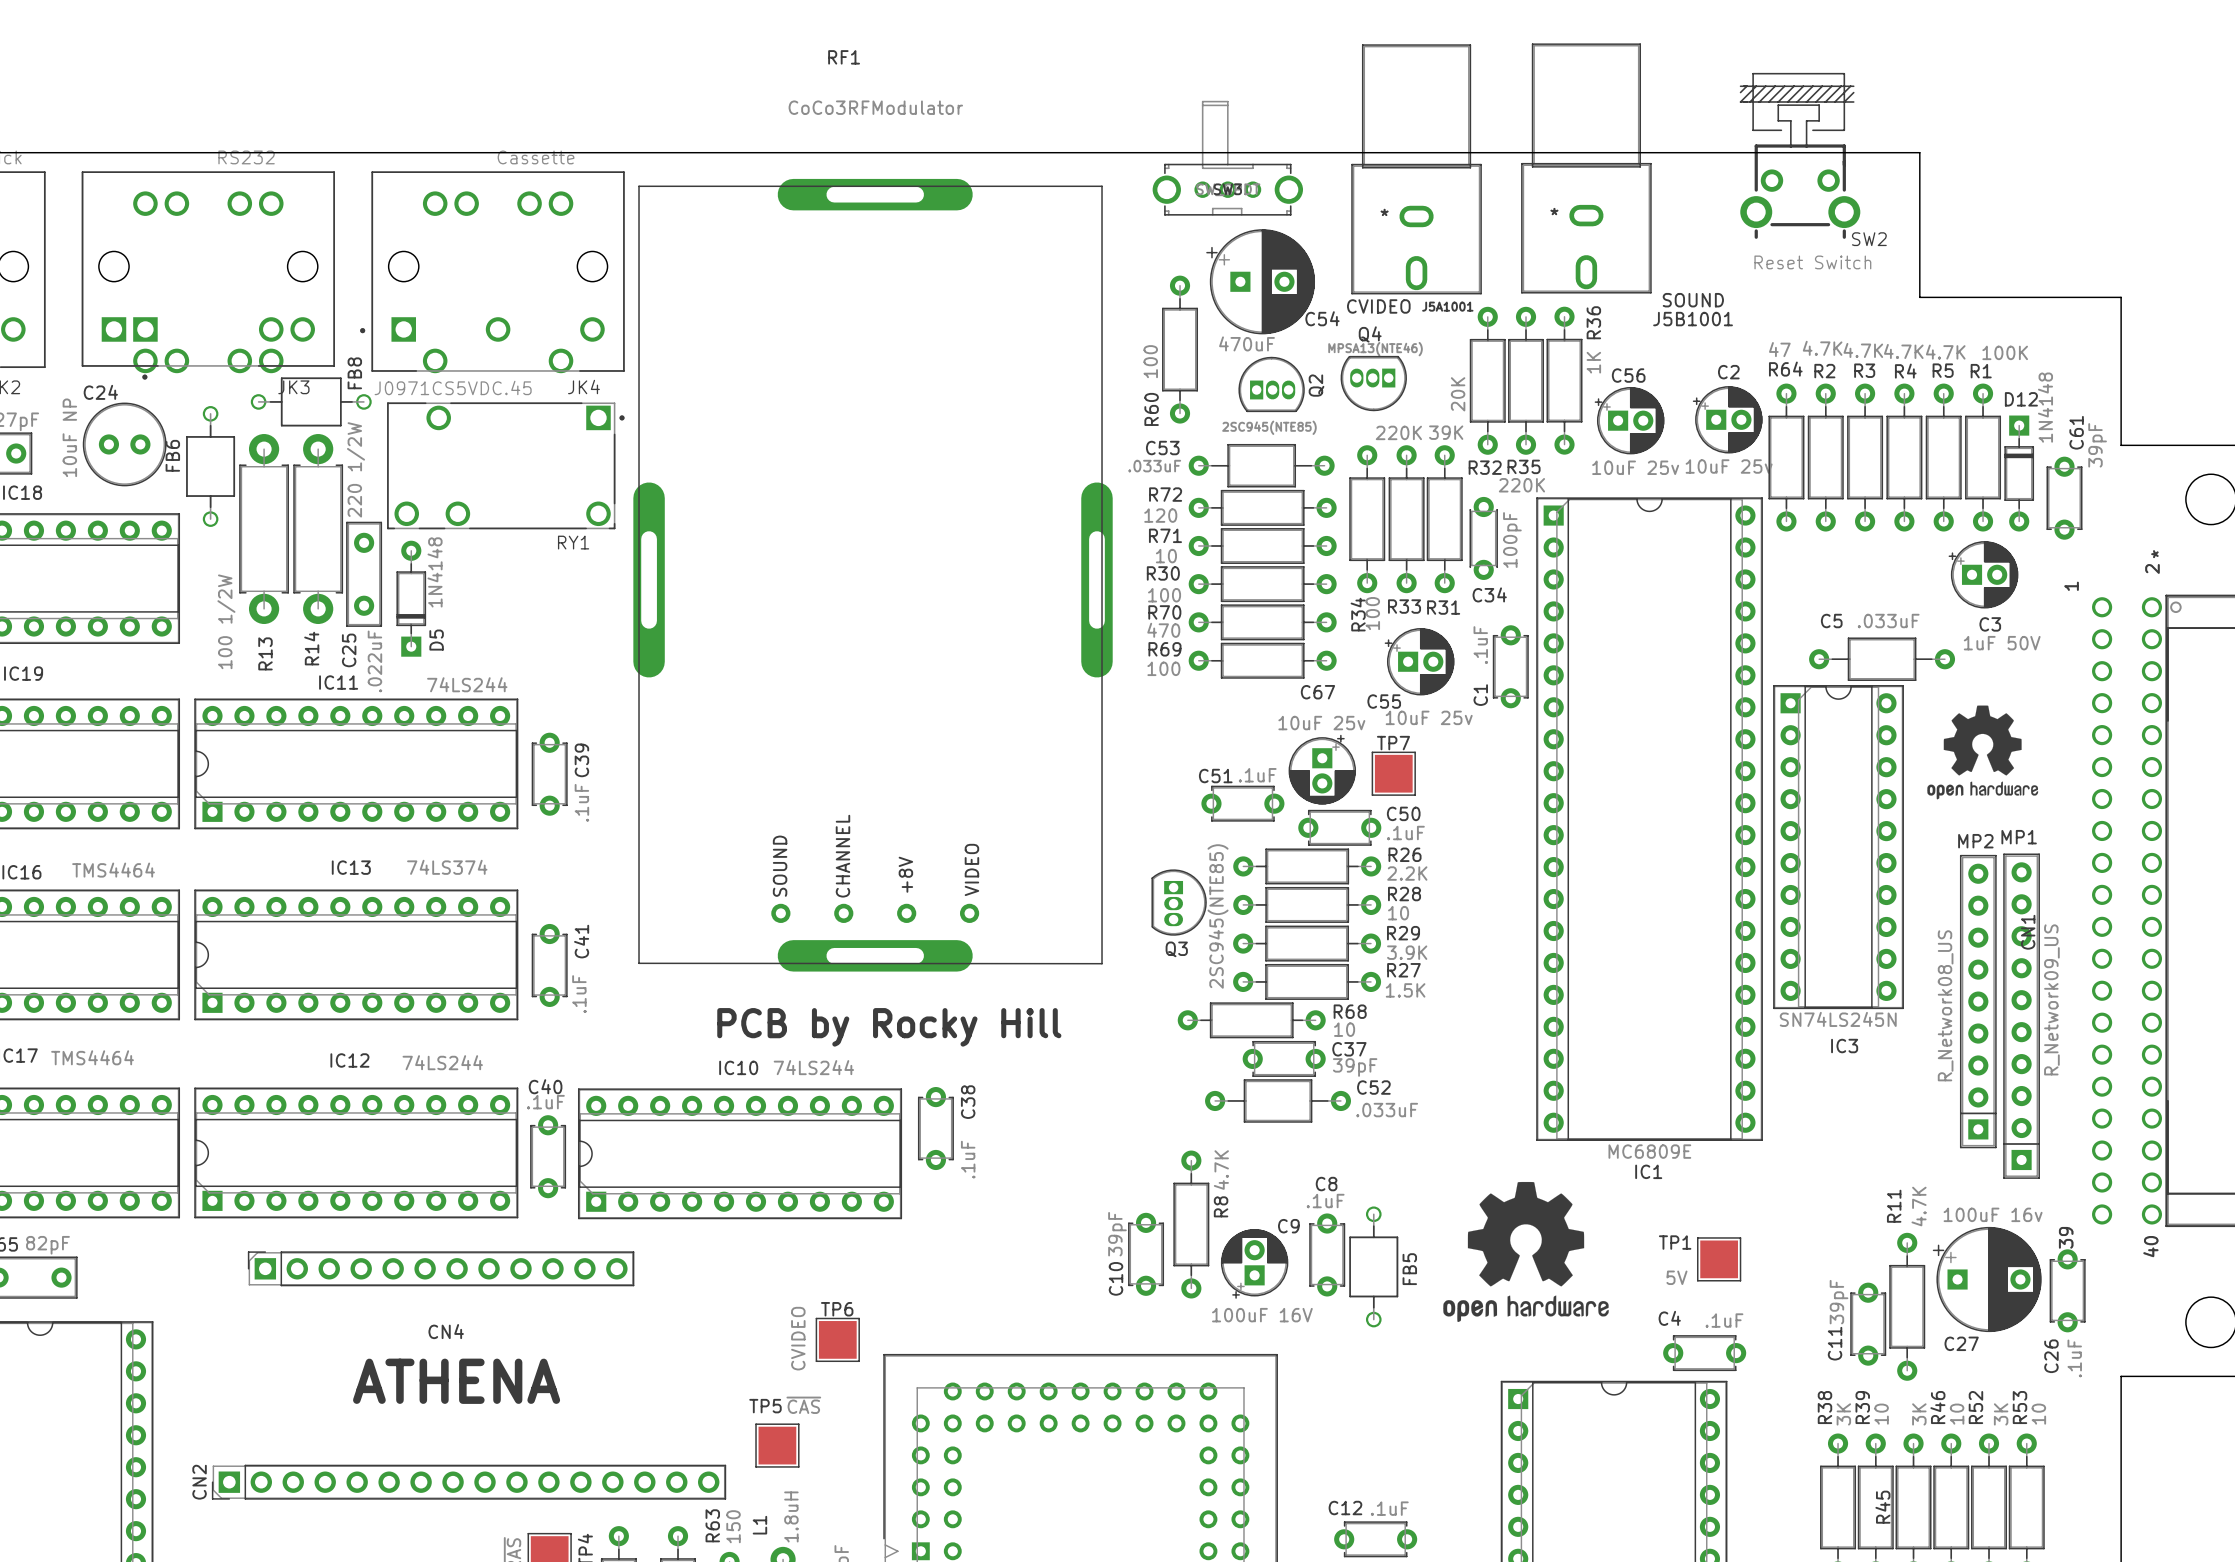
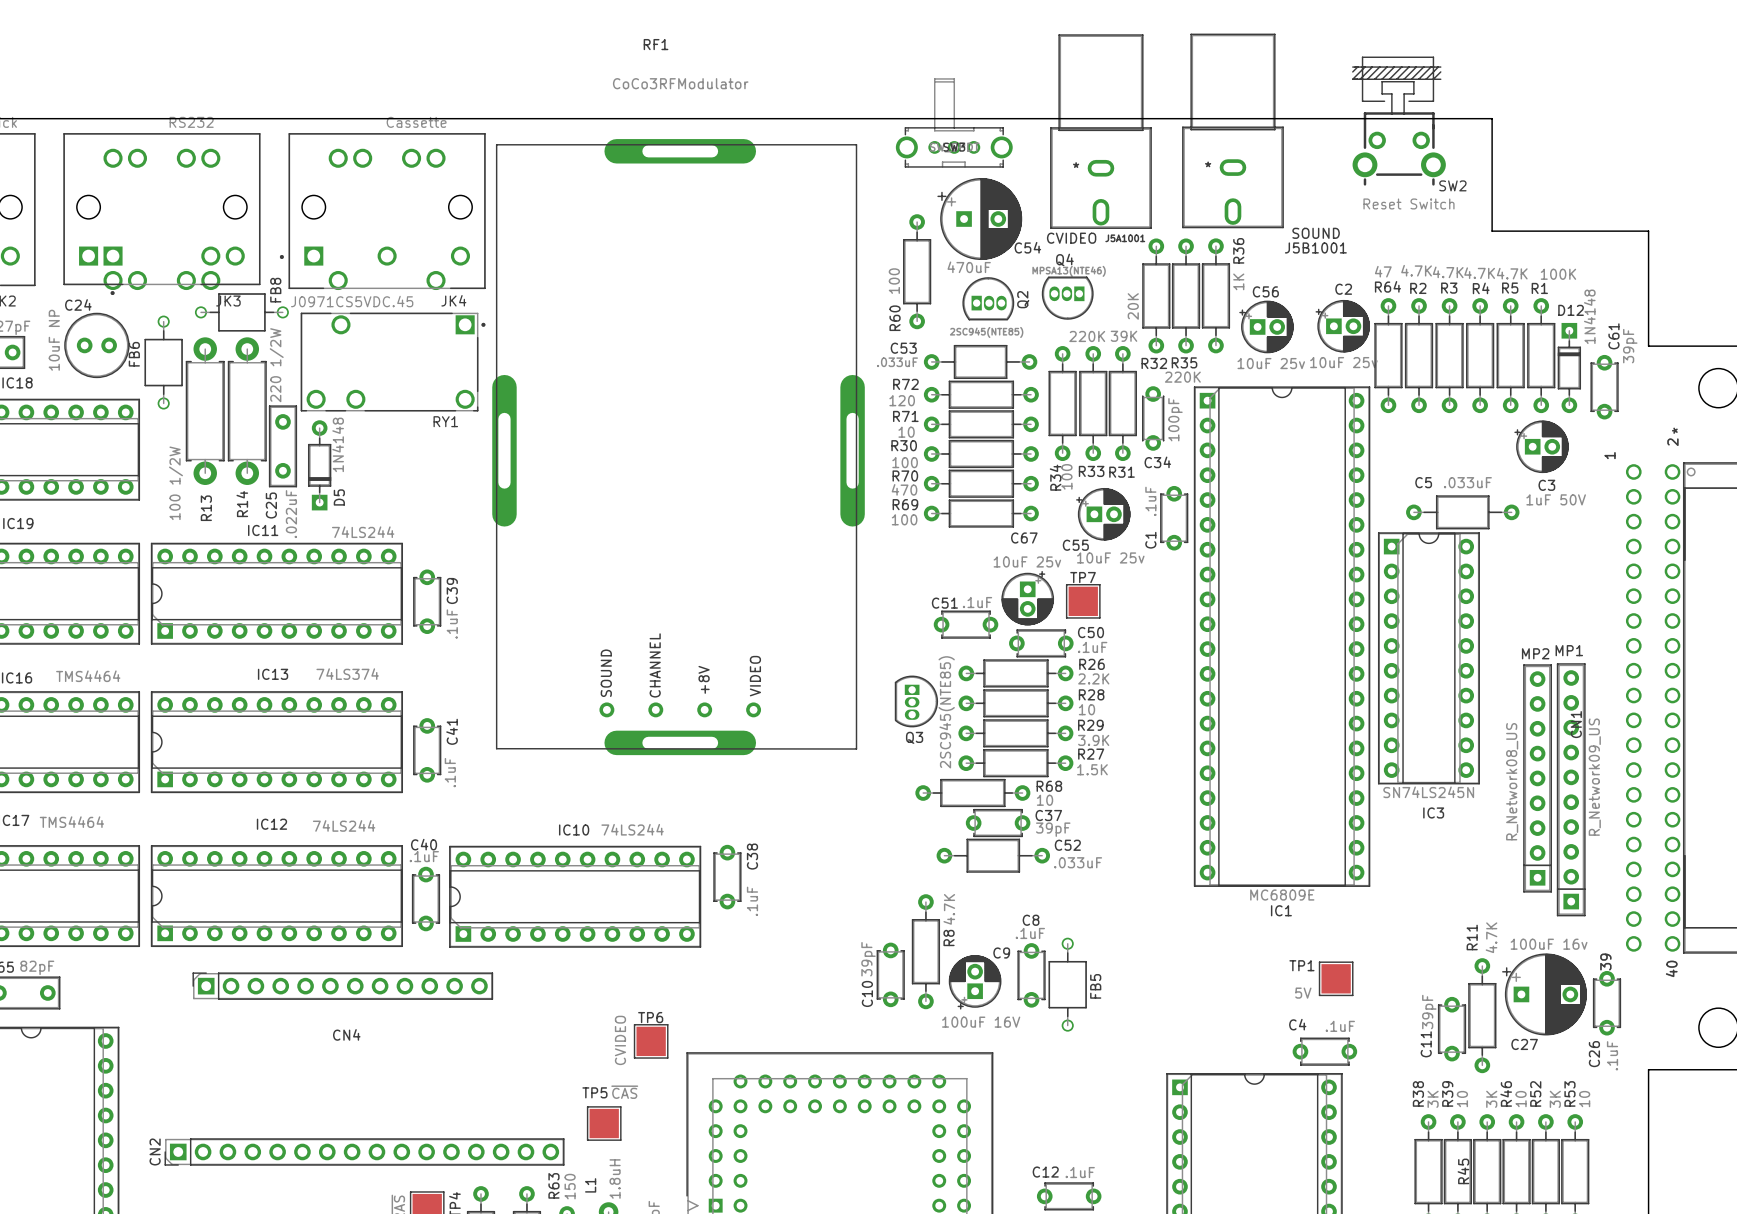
drawing: [1927, 705, 2039, 800] -> none
text: PCB by Rocky Hill (889, 1027) -> none
drawing: [1443, 1181, 1609, 1323] -> none
text: ATHENA (456, 1381) -> none

